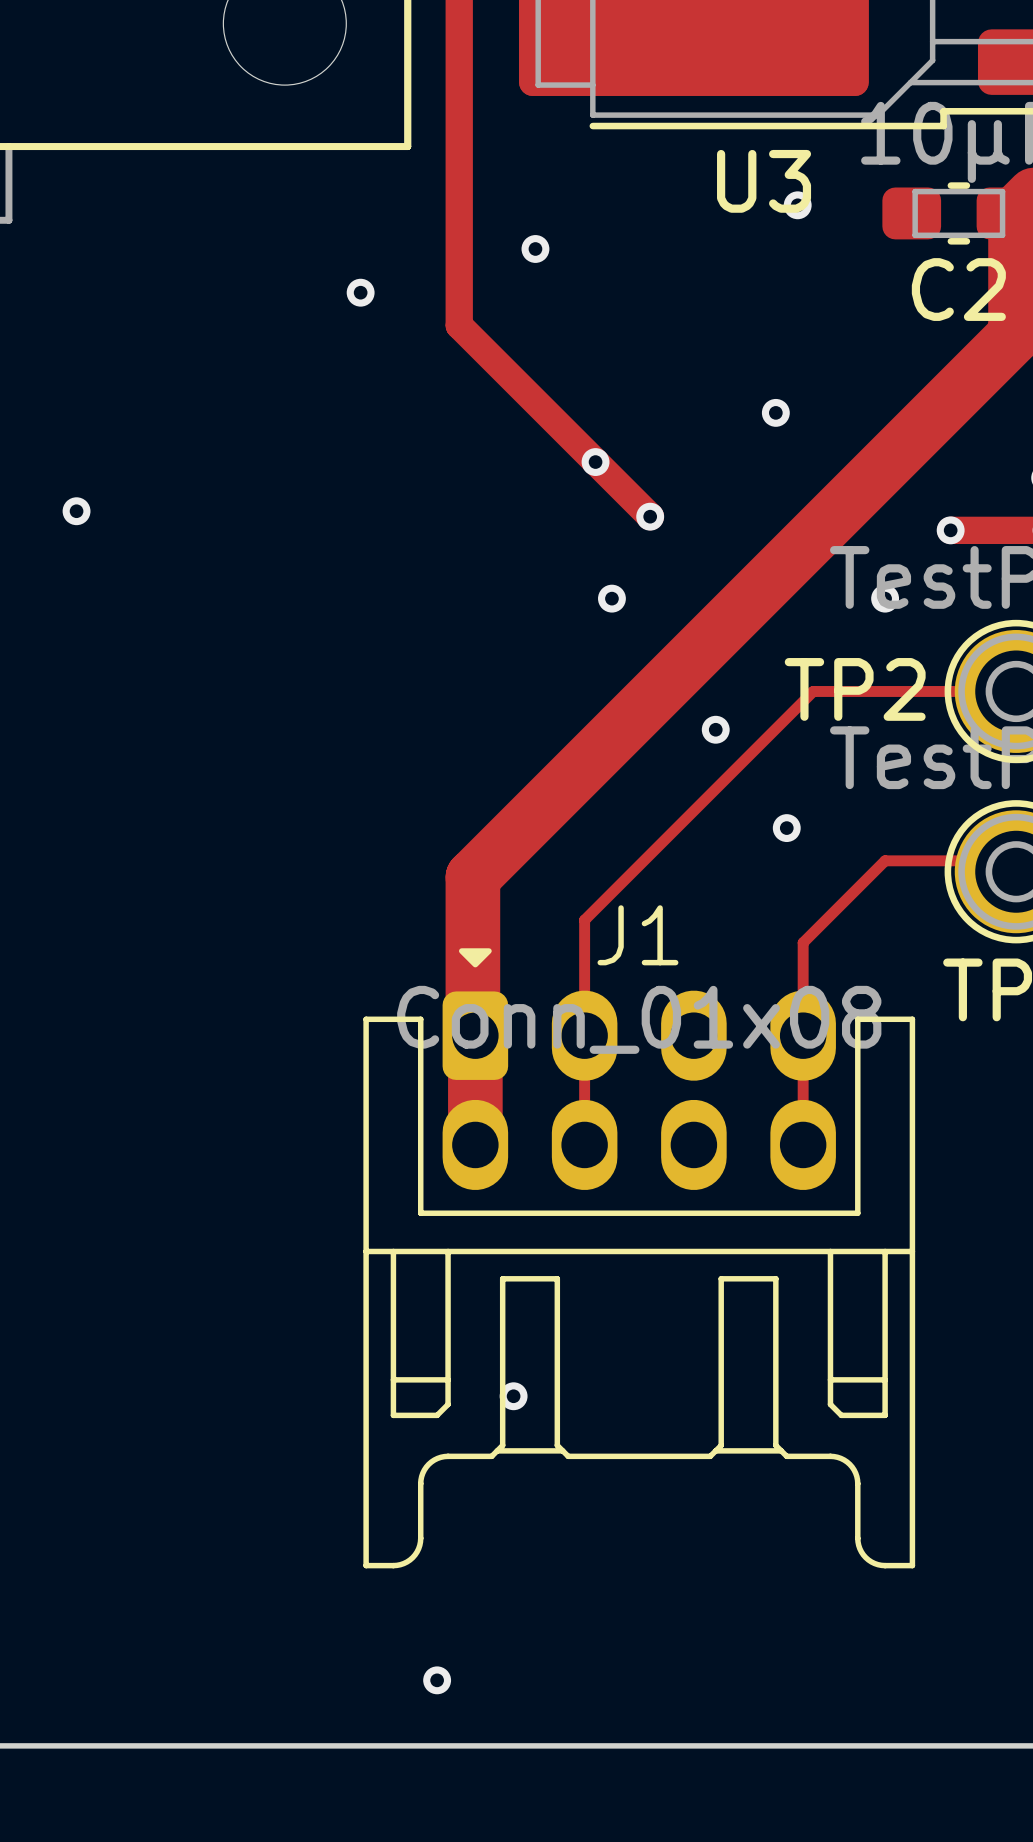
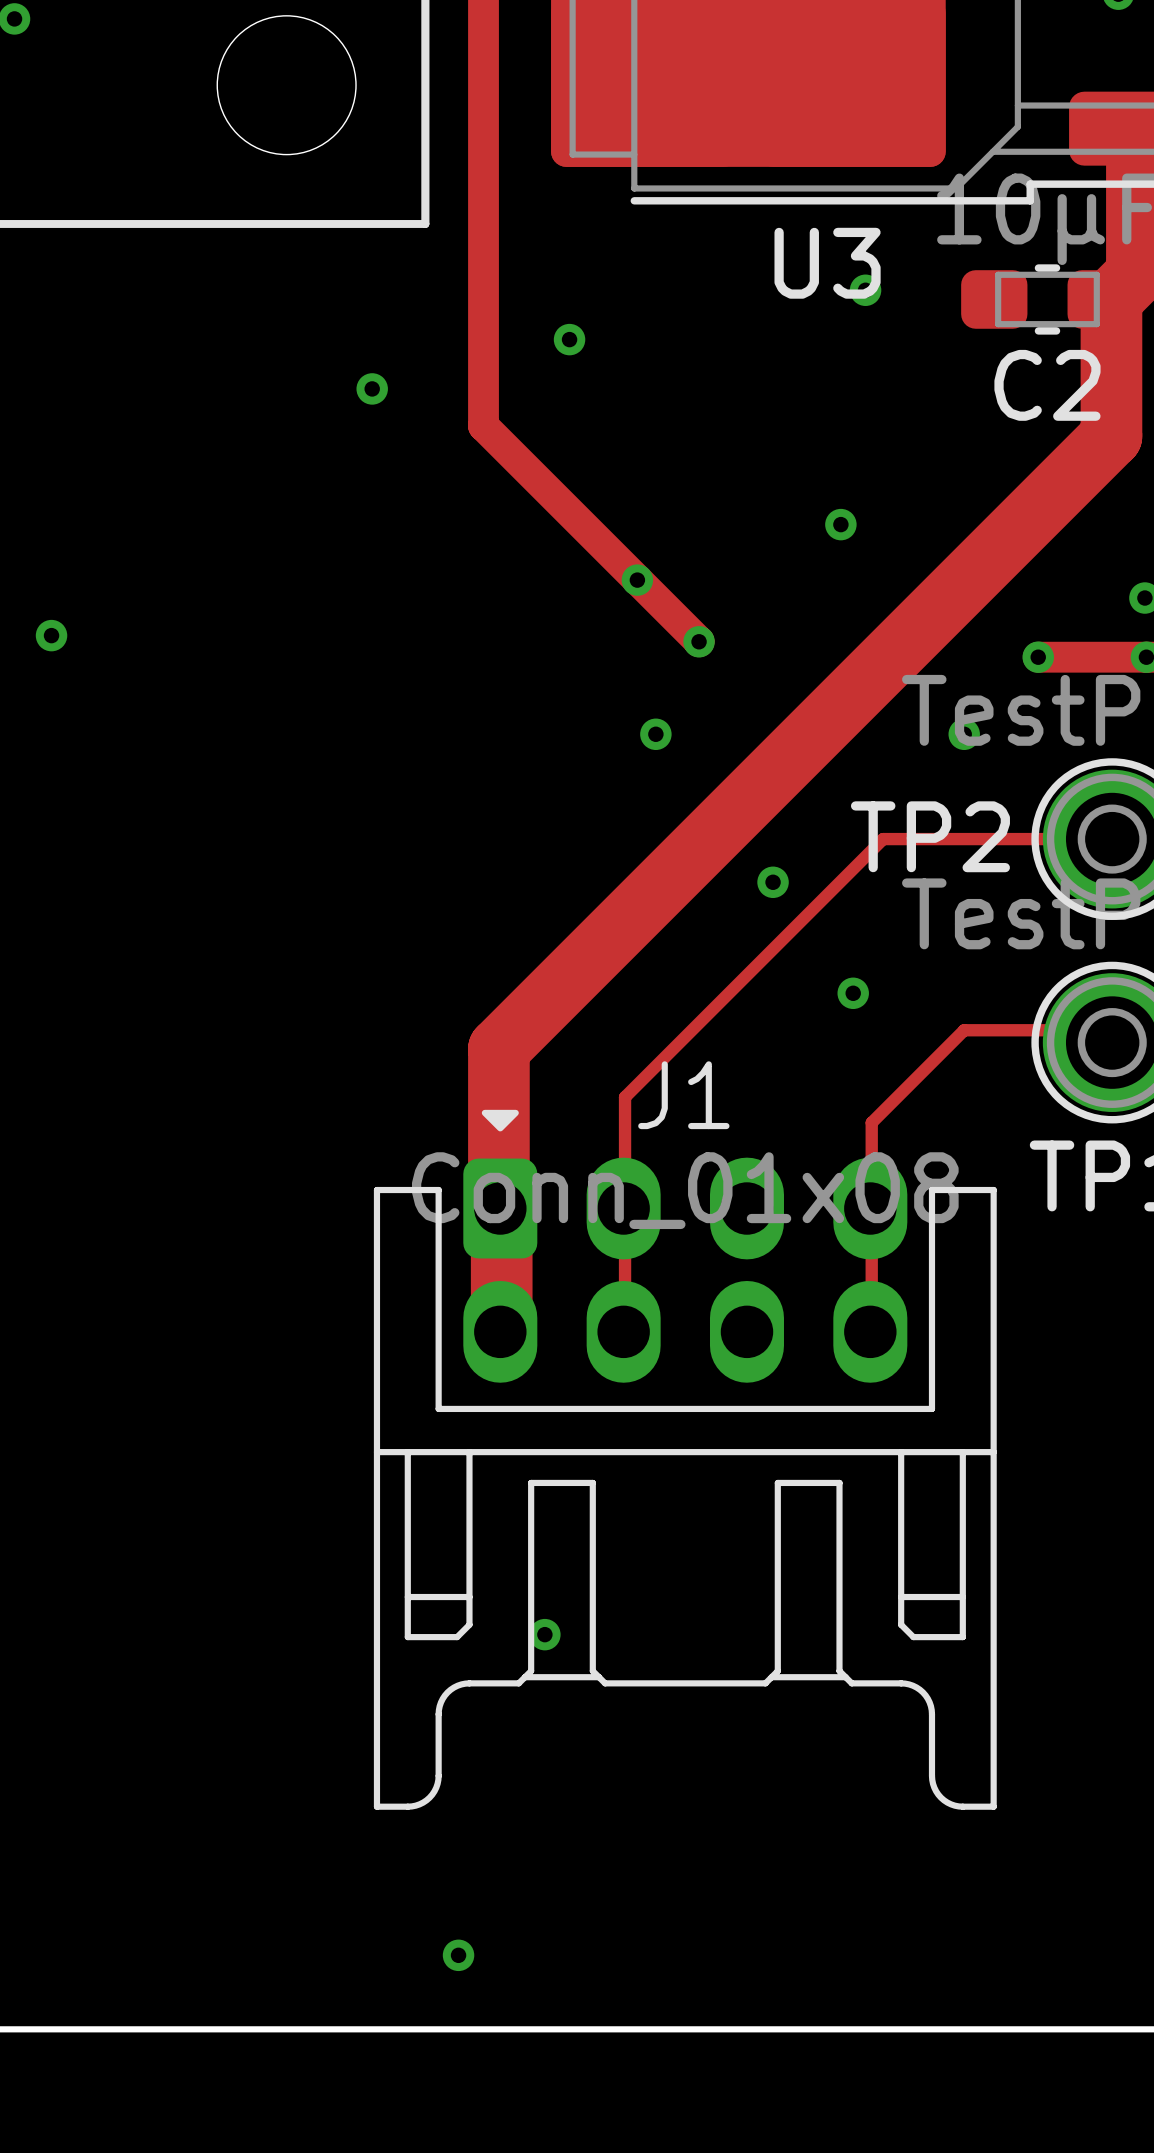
J1 position: (639, 1258) -> (685, 1459)

